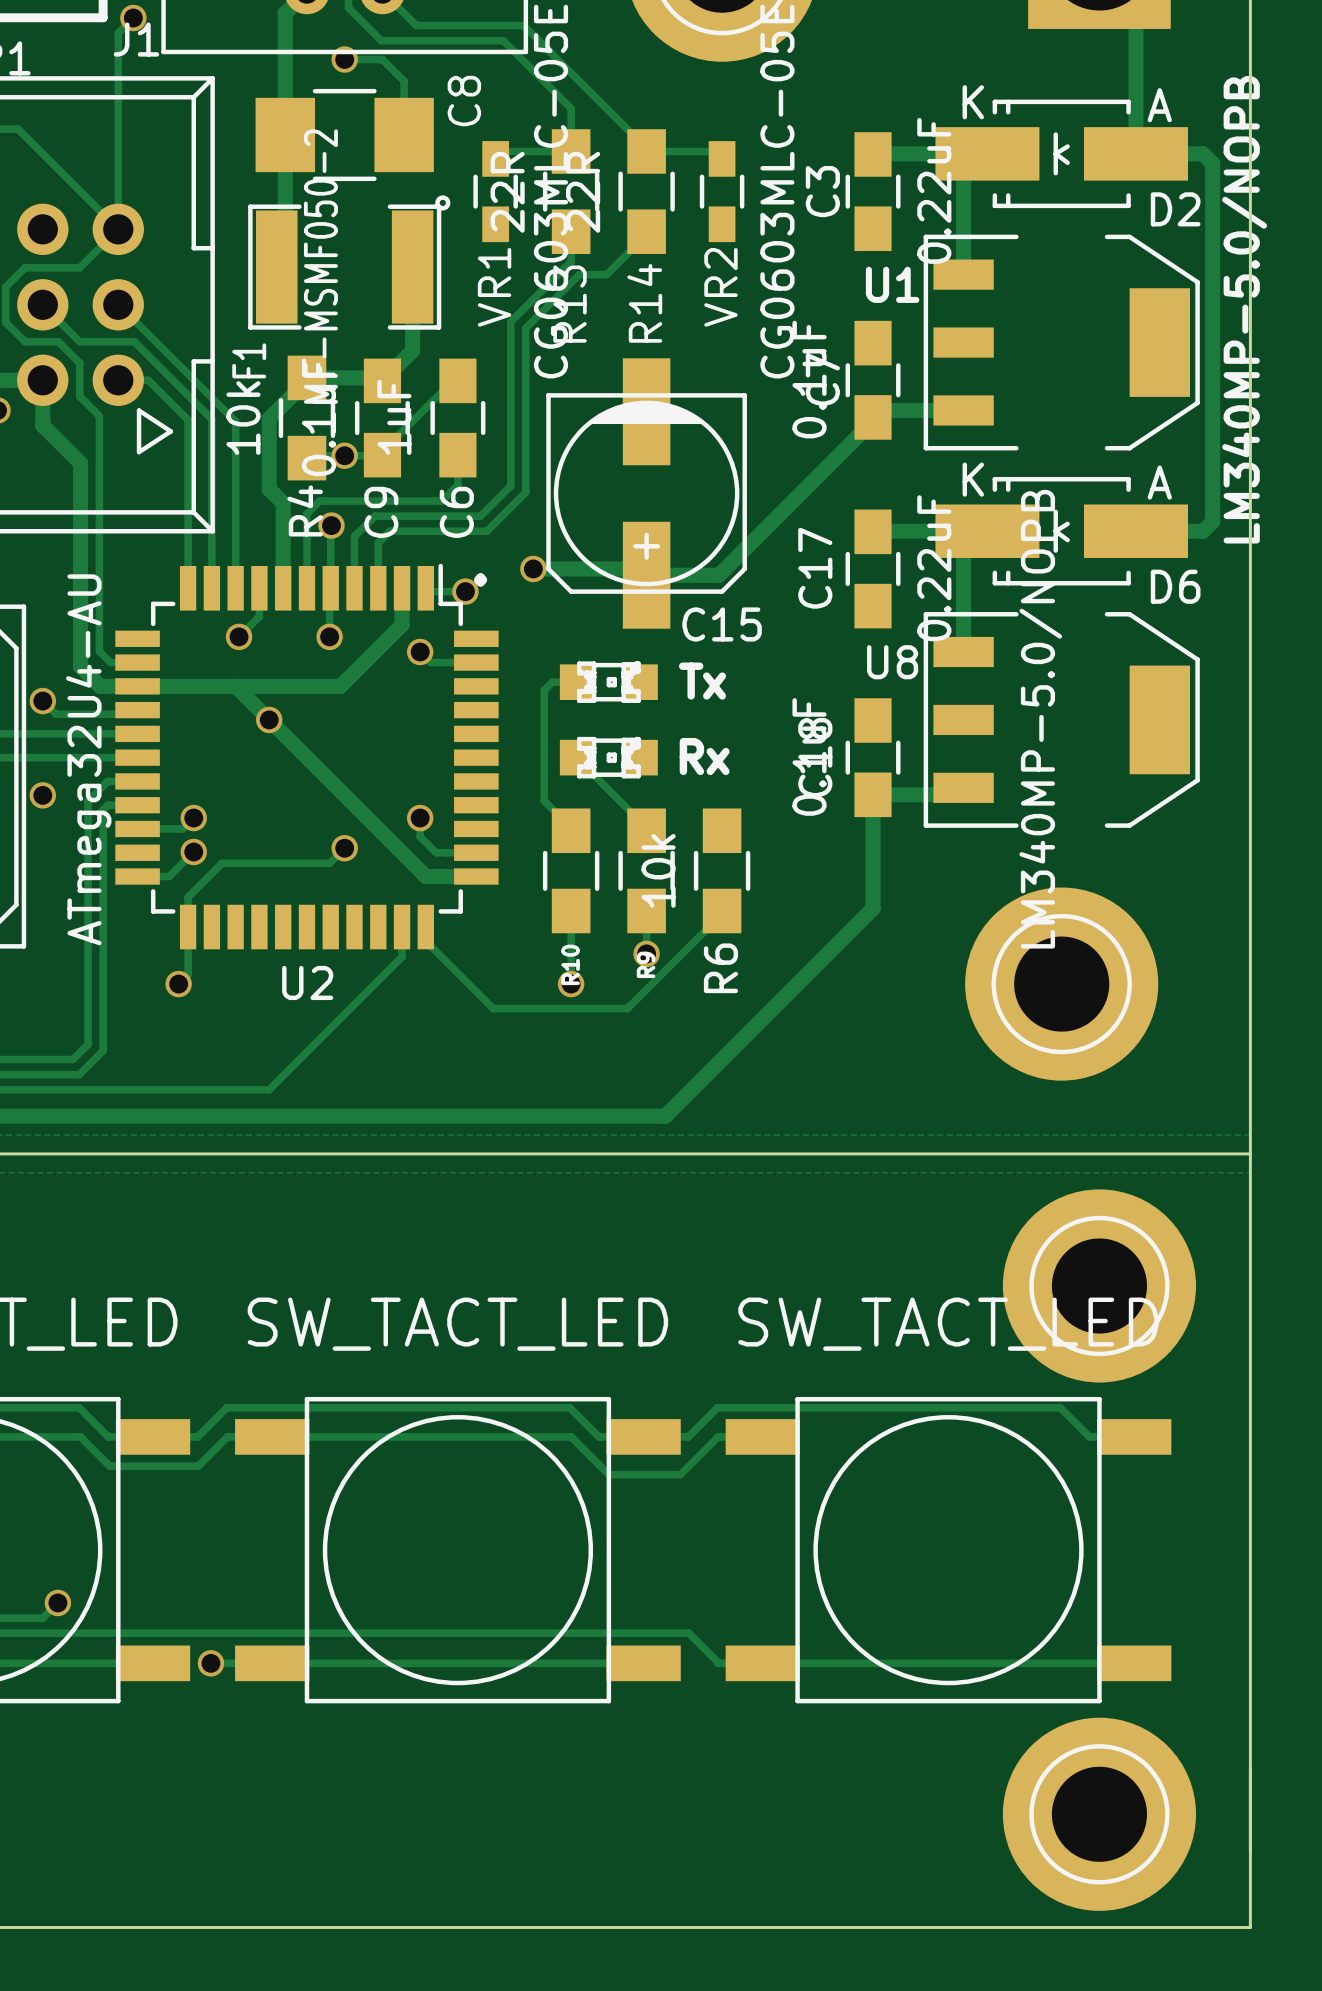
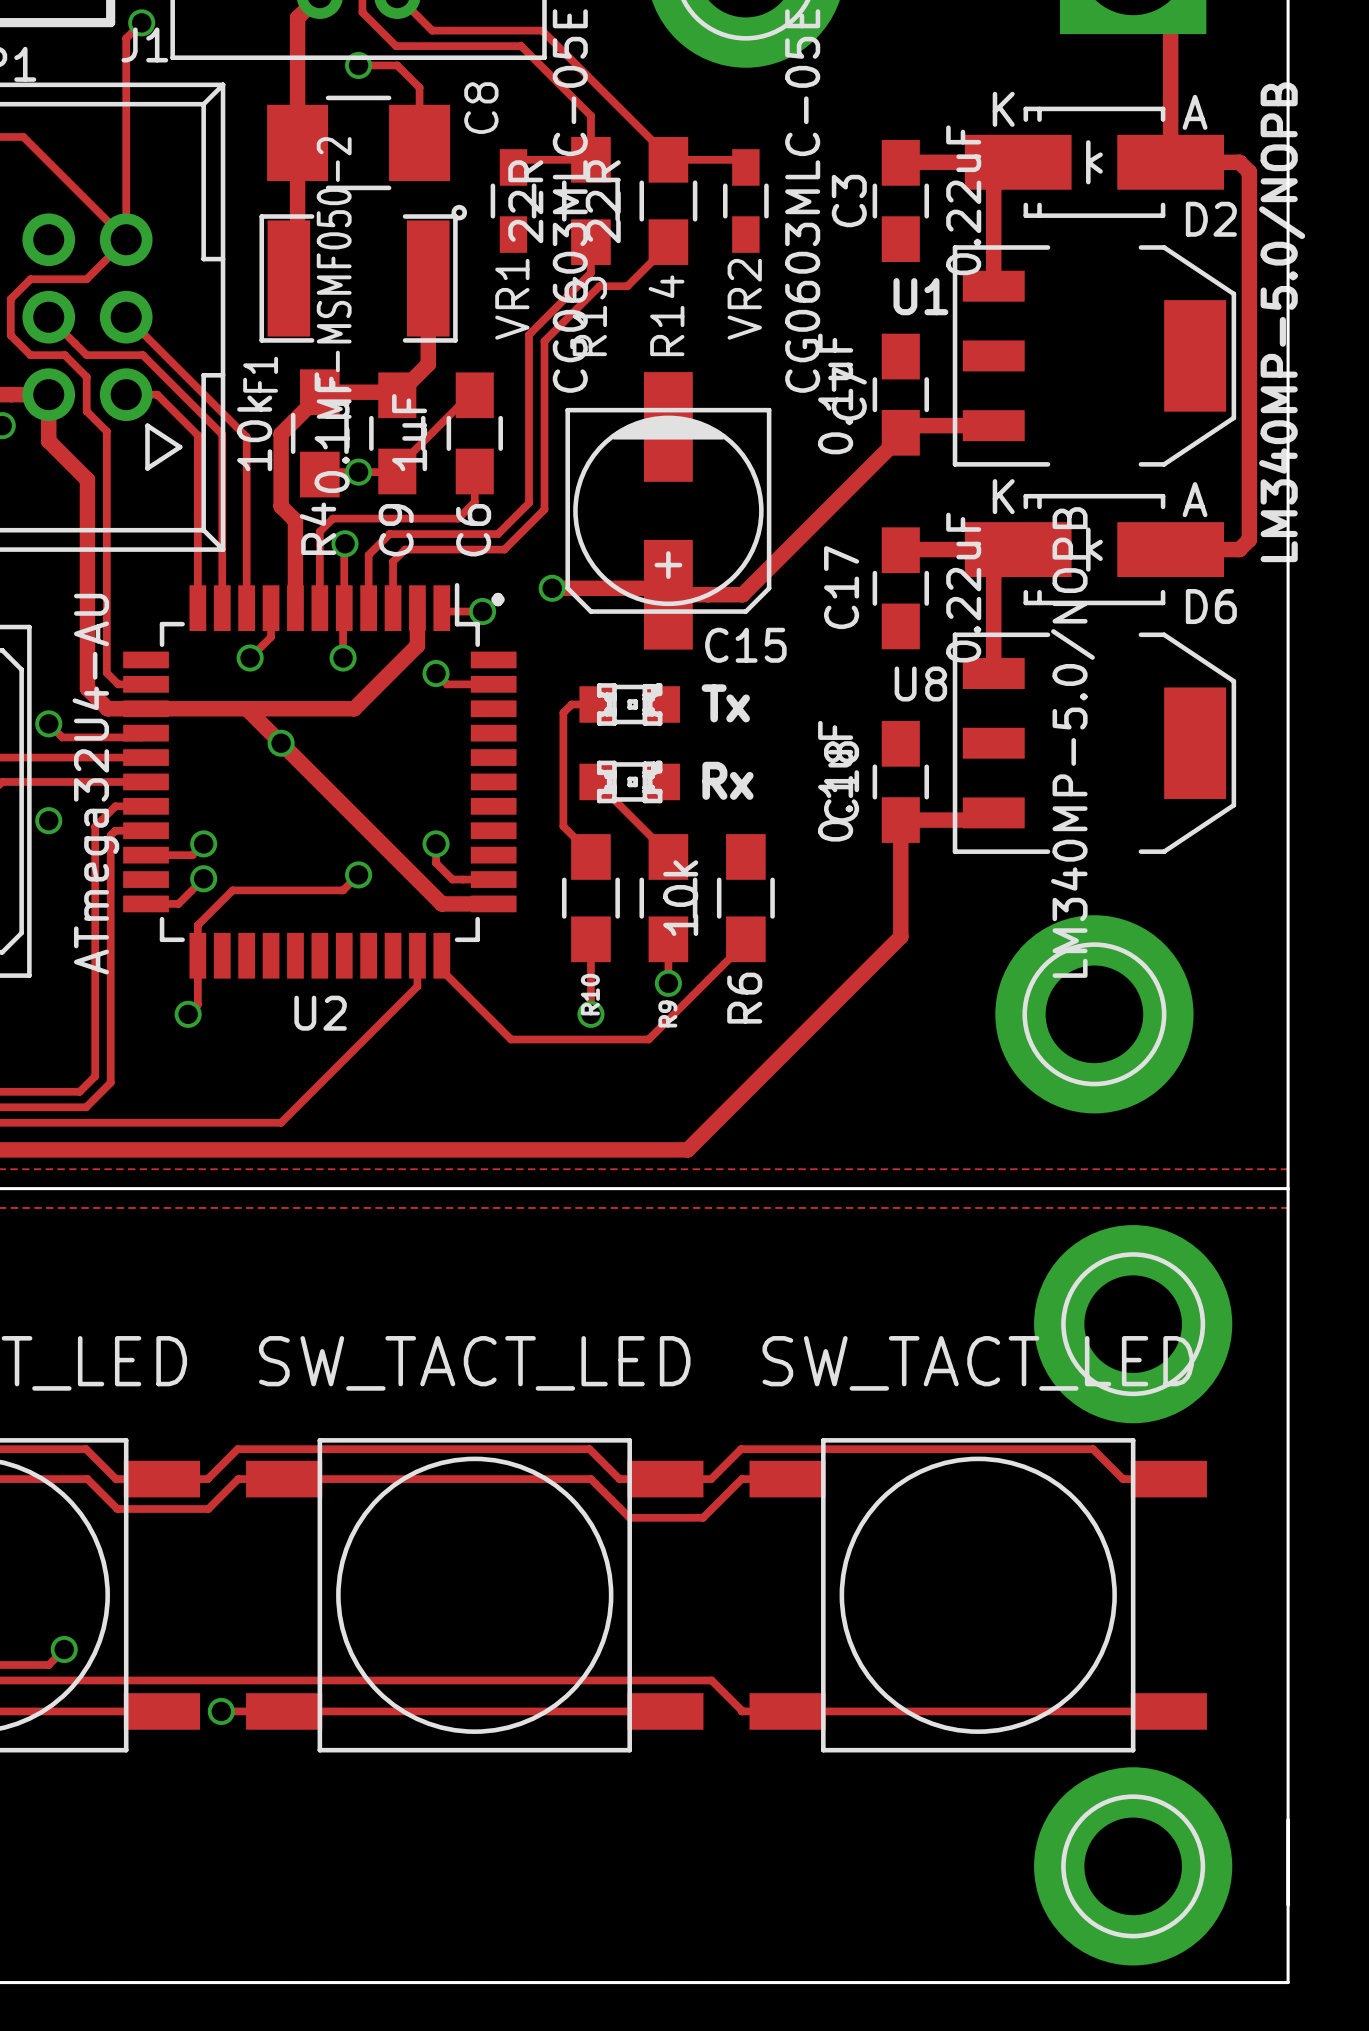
R9 name position: R9 (646, 964) -> R9 (667, 1013)

